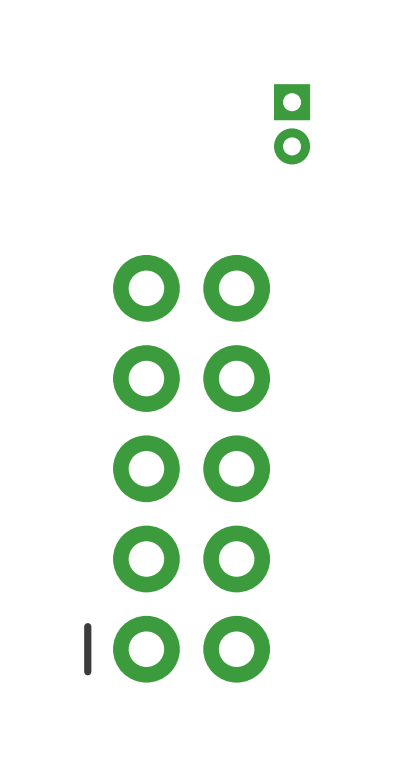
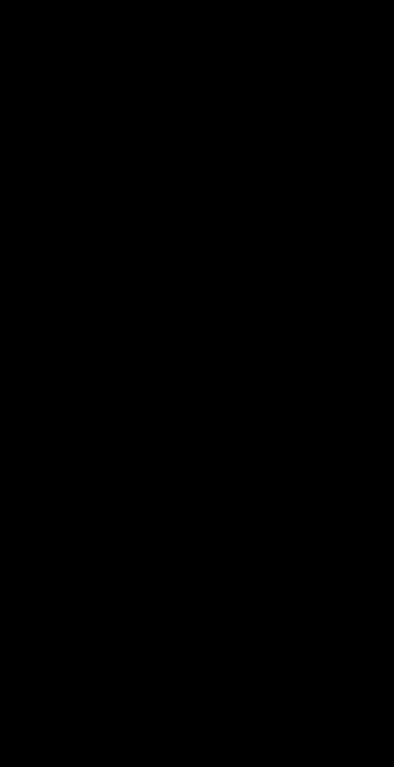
part: (292, 124) -> none
part: (177, 468) -> none

